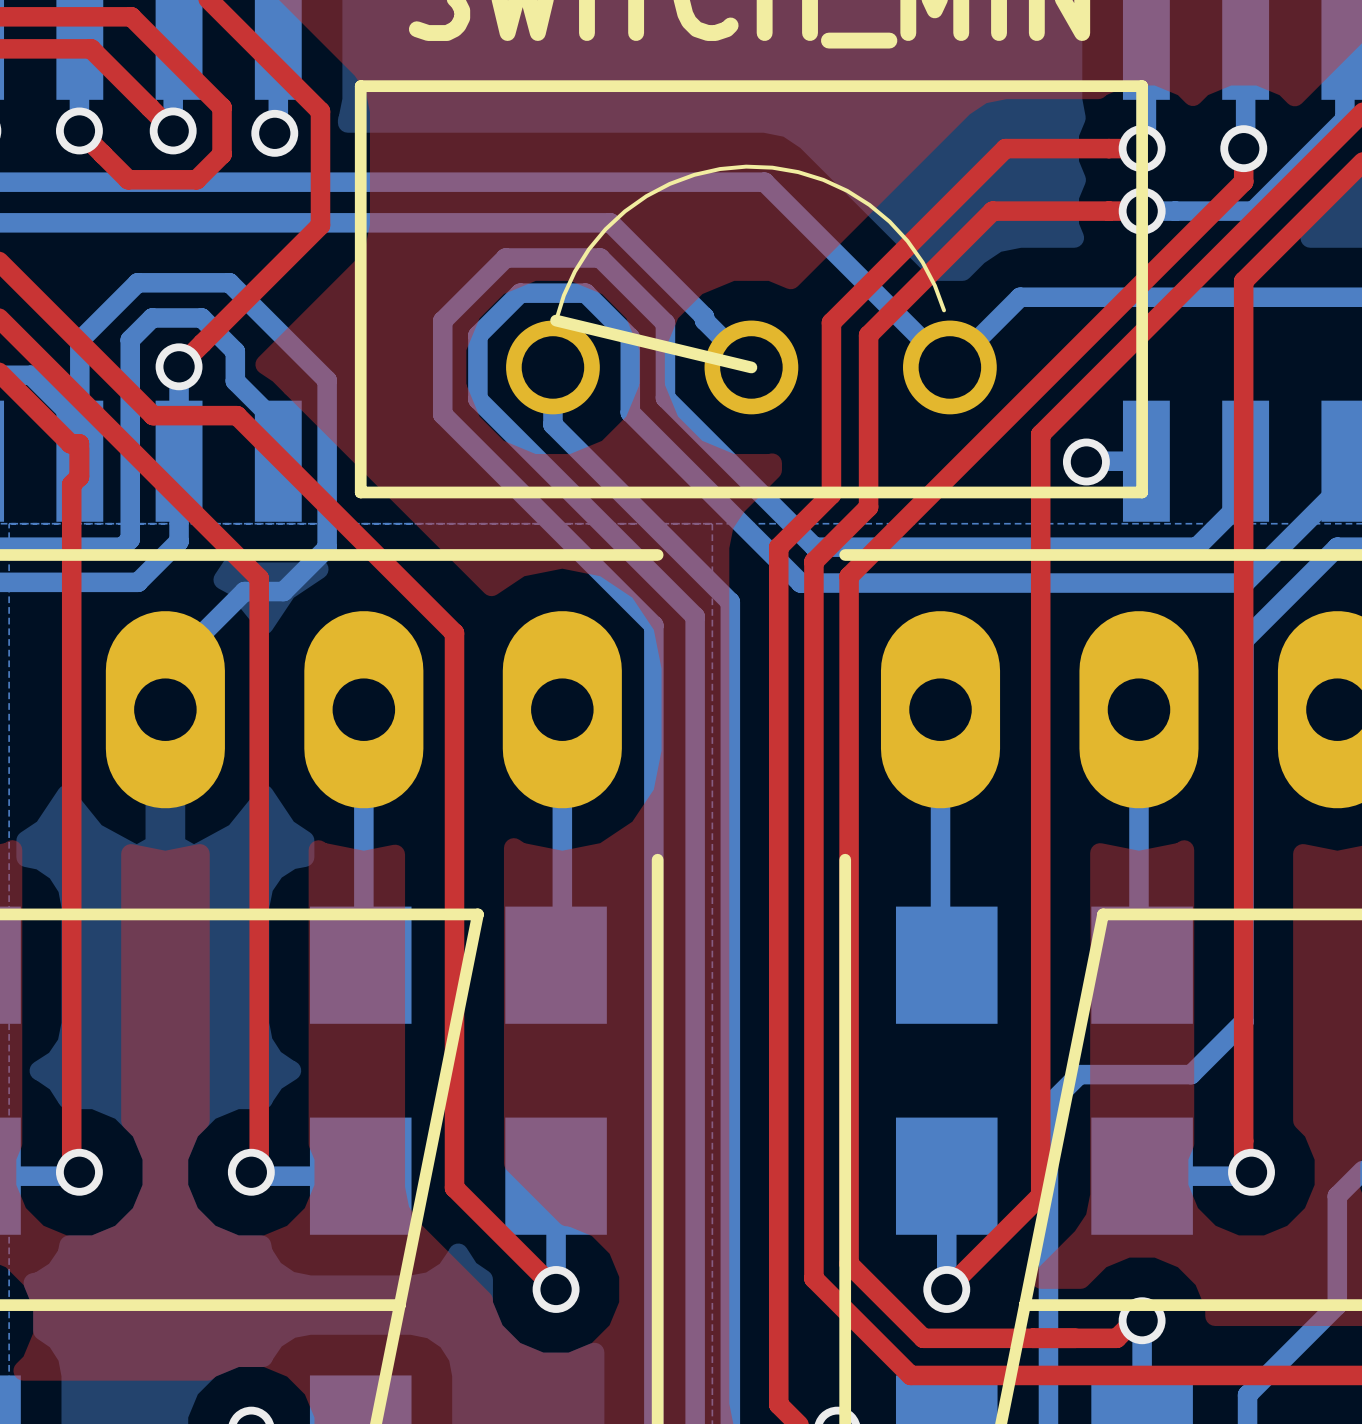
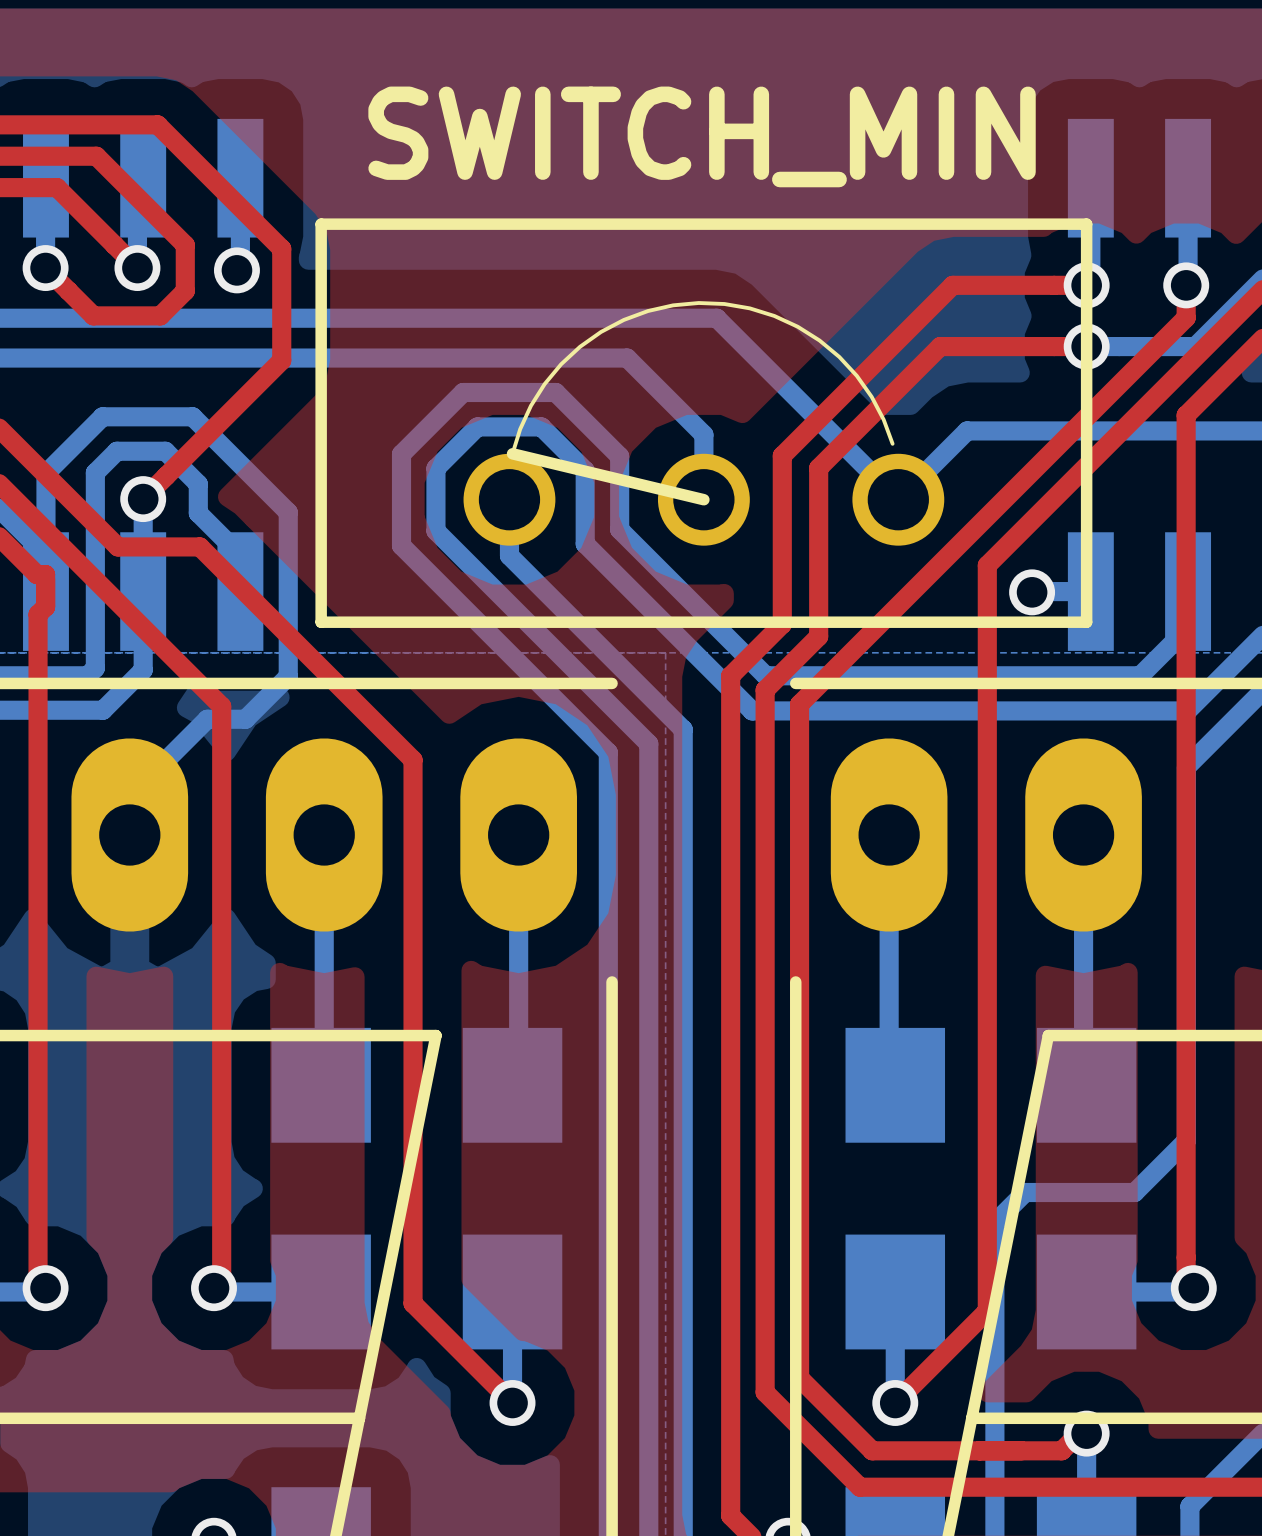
bottom track: (610, 222) (704, 317) (704, 320) (751, 367) -> (565, 358) (627, 358) (703, 434) (703, 499)

